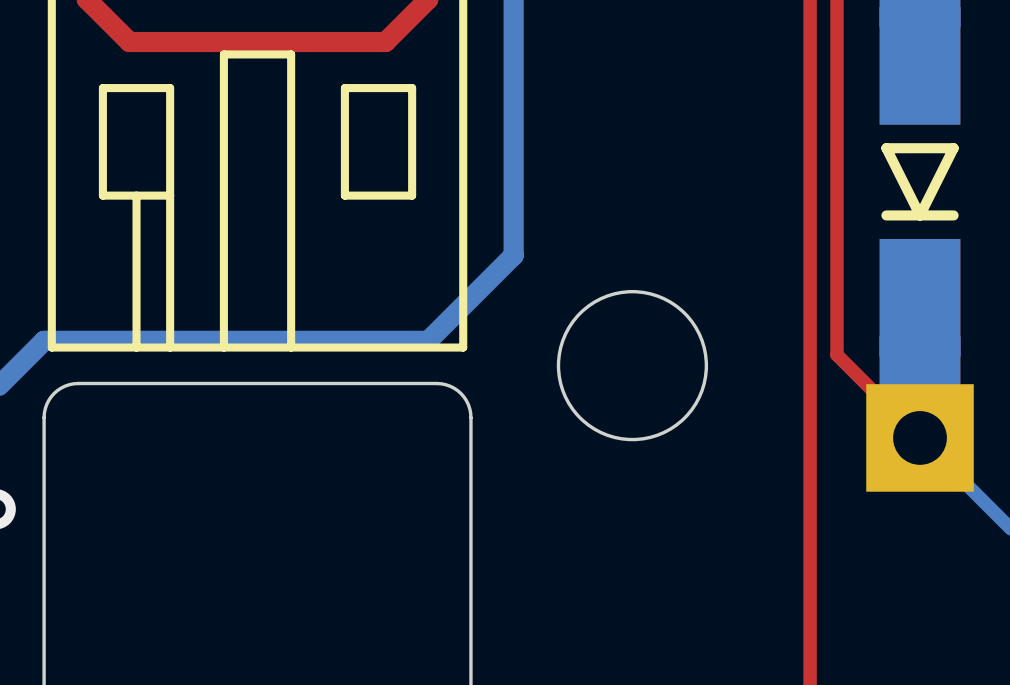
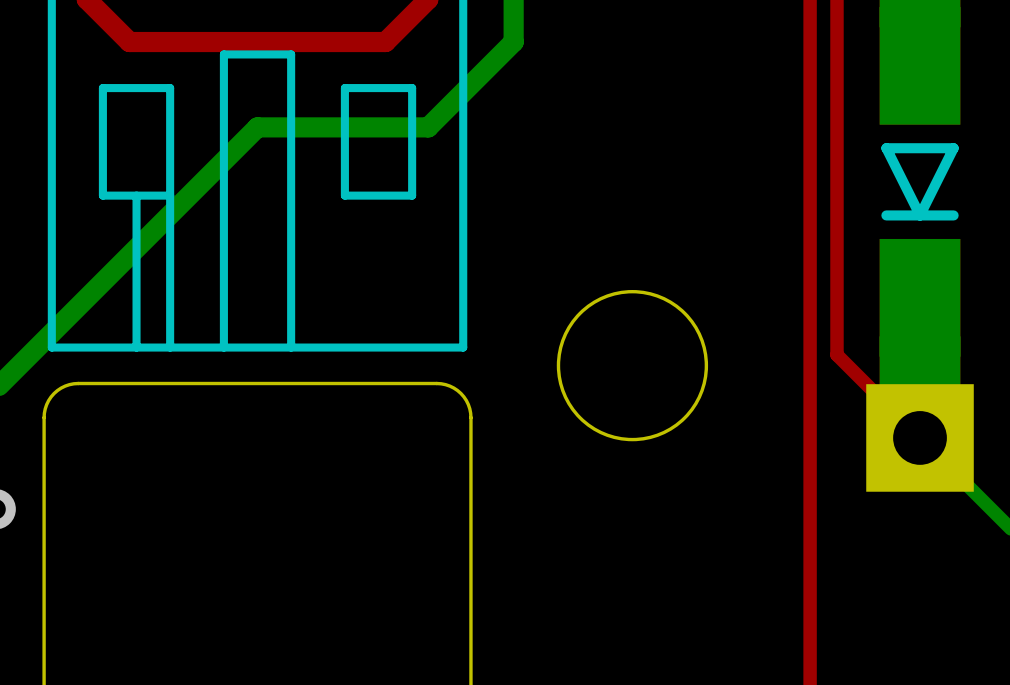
bottom track: (513, 42) (513, 255) (428, 340) (44, 340) -> (513, 42) (428, 127) (257, 127) (44, 340)

